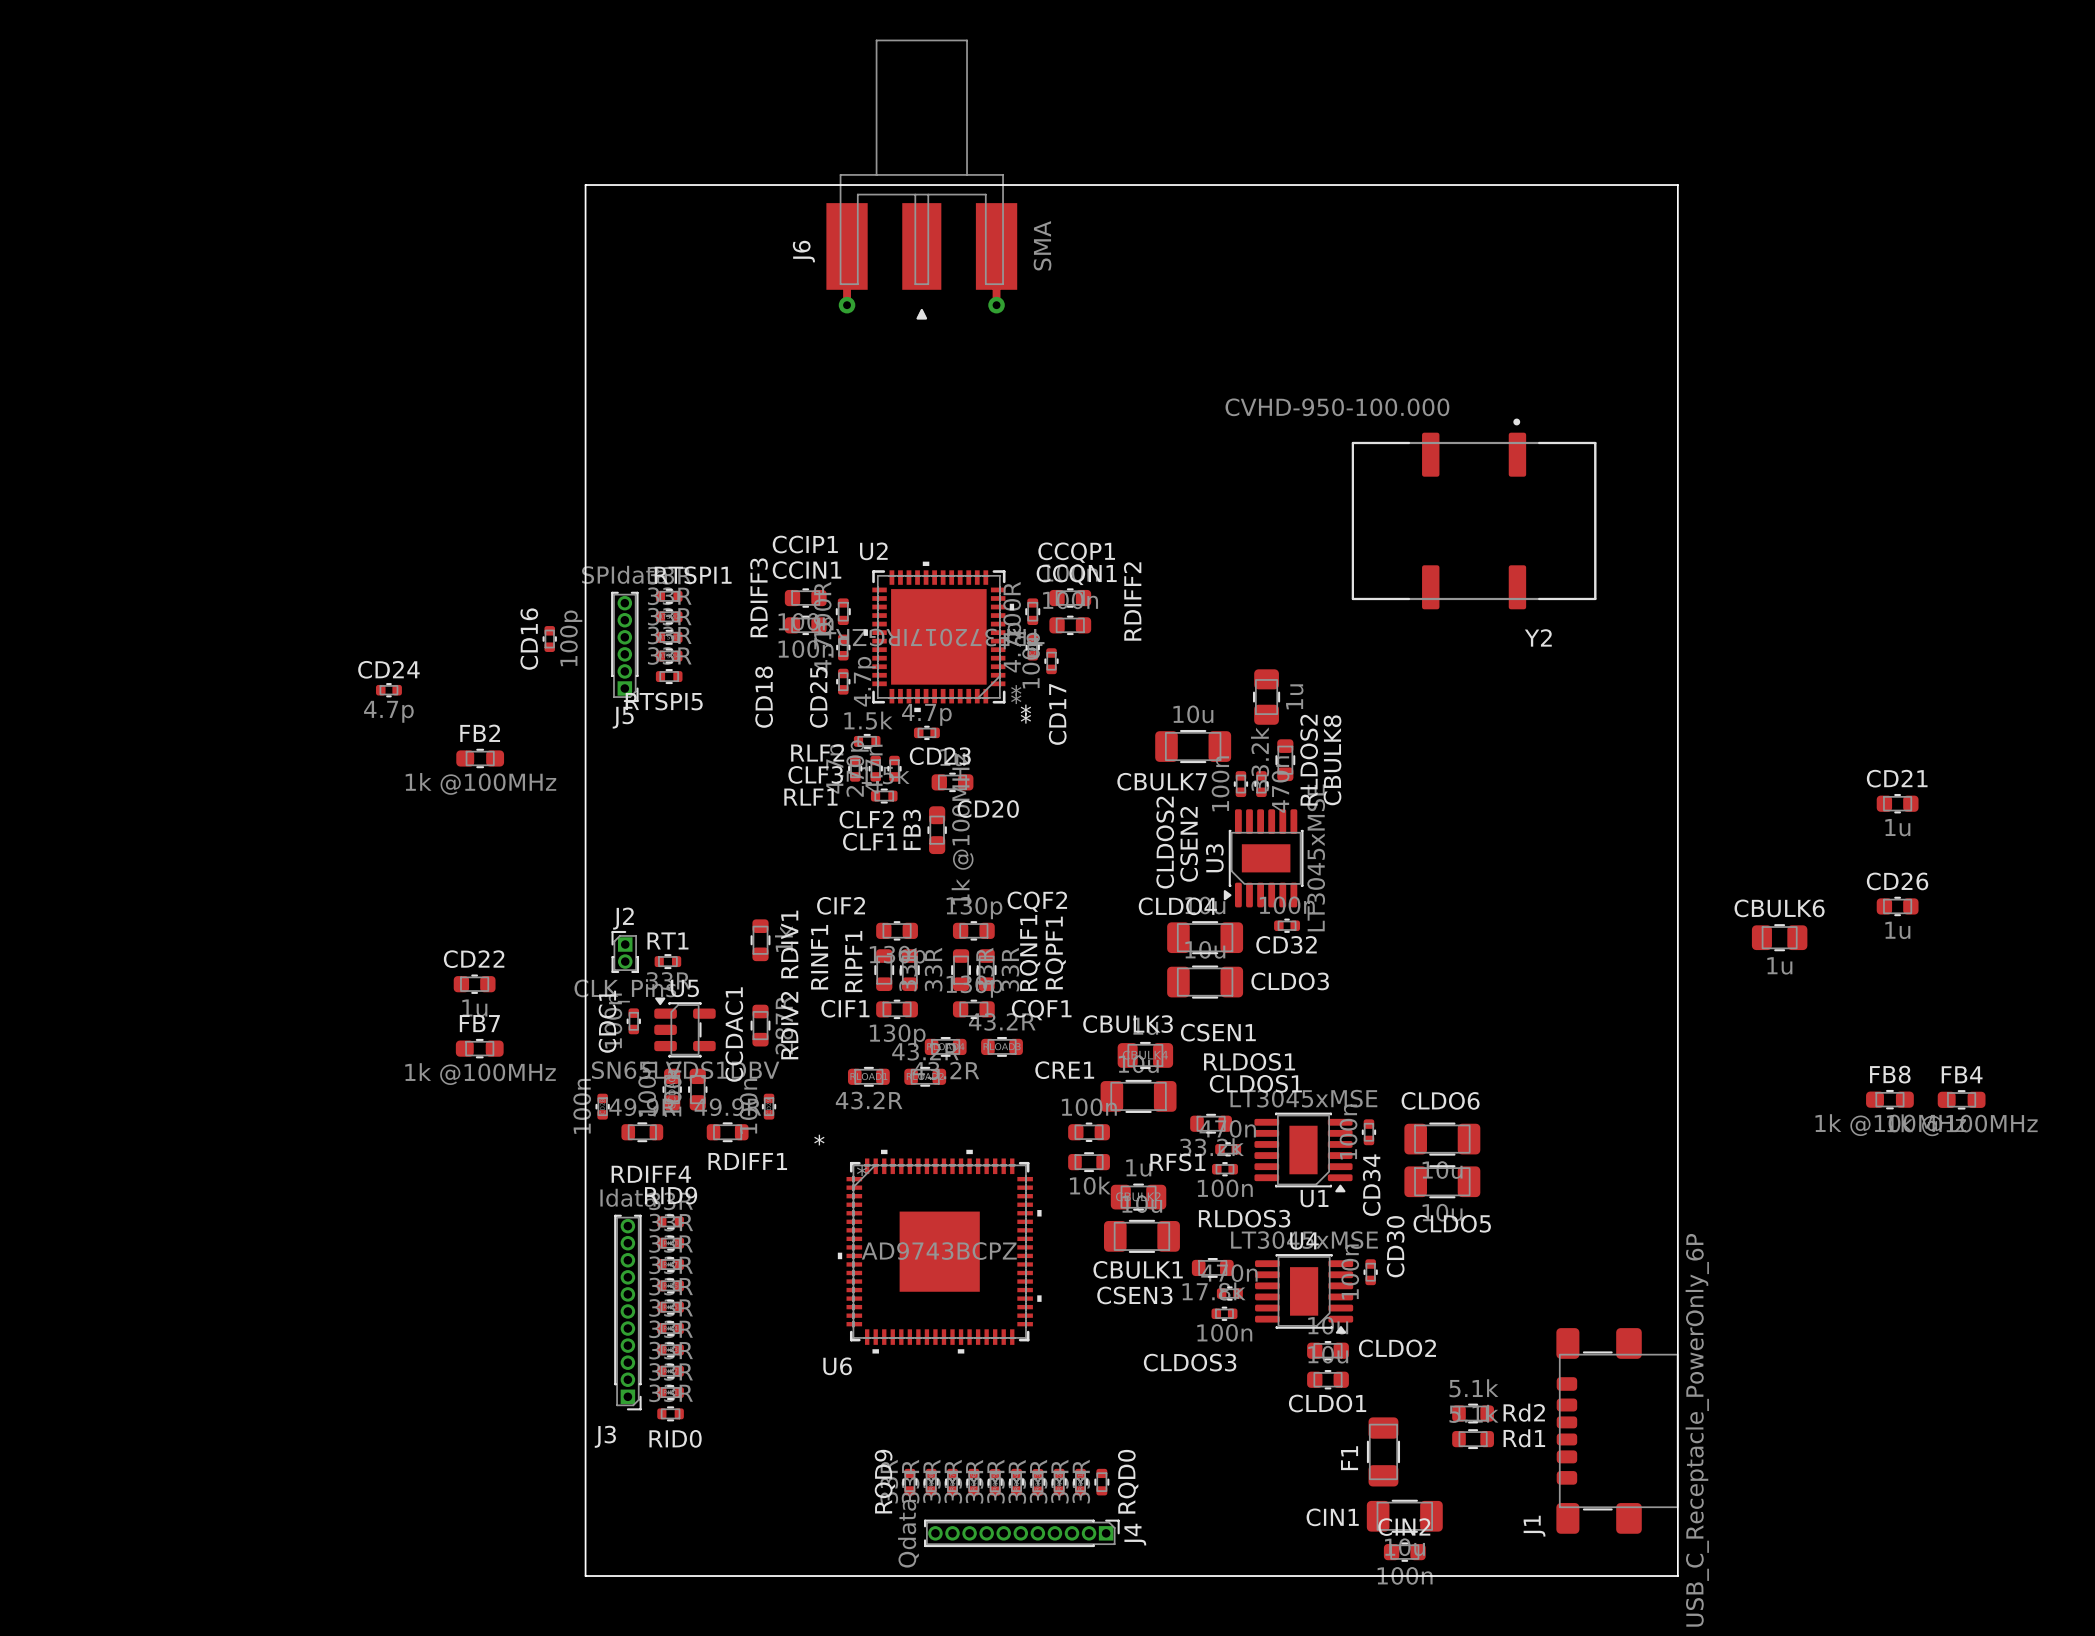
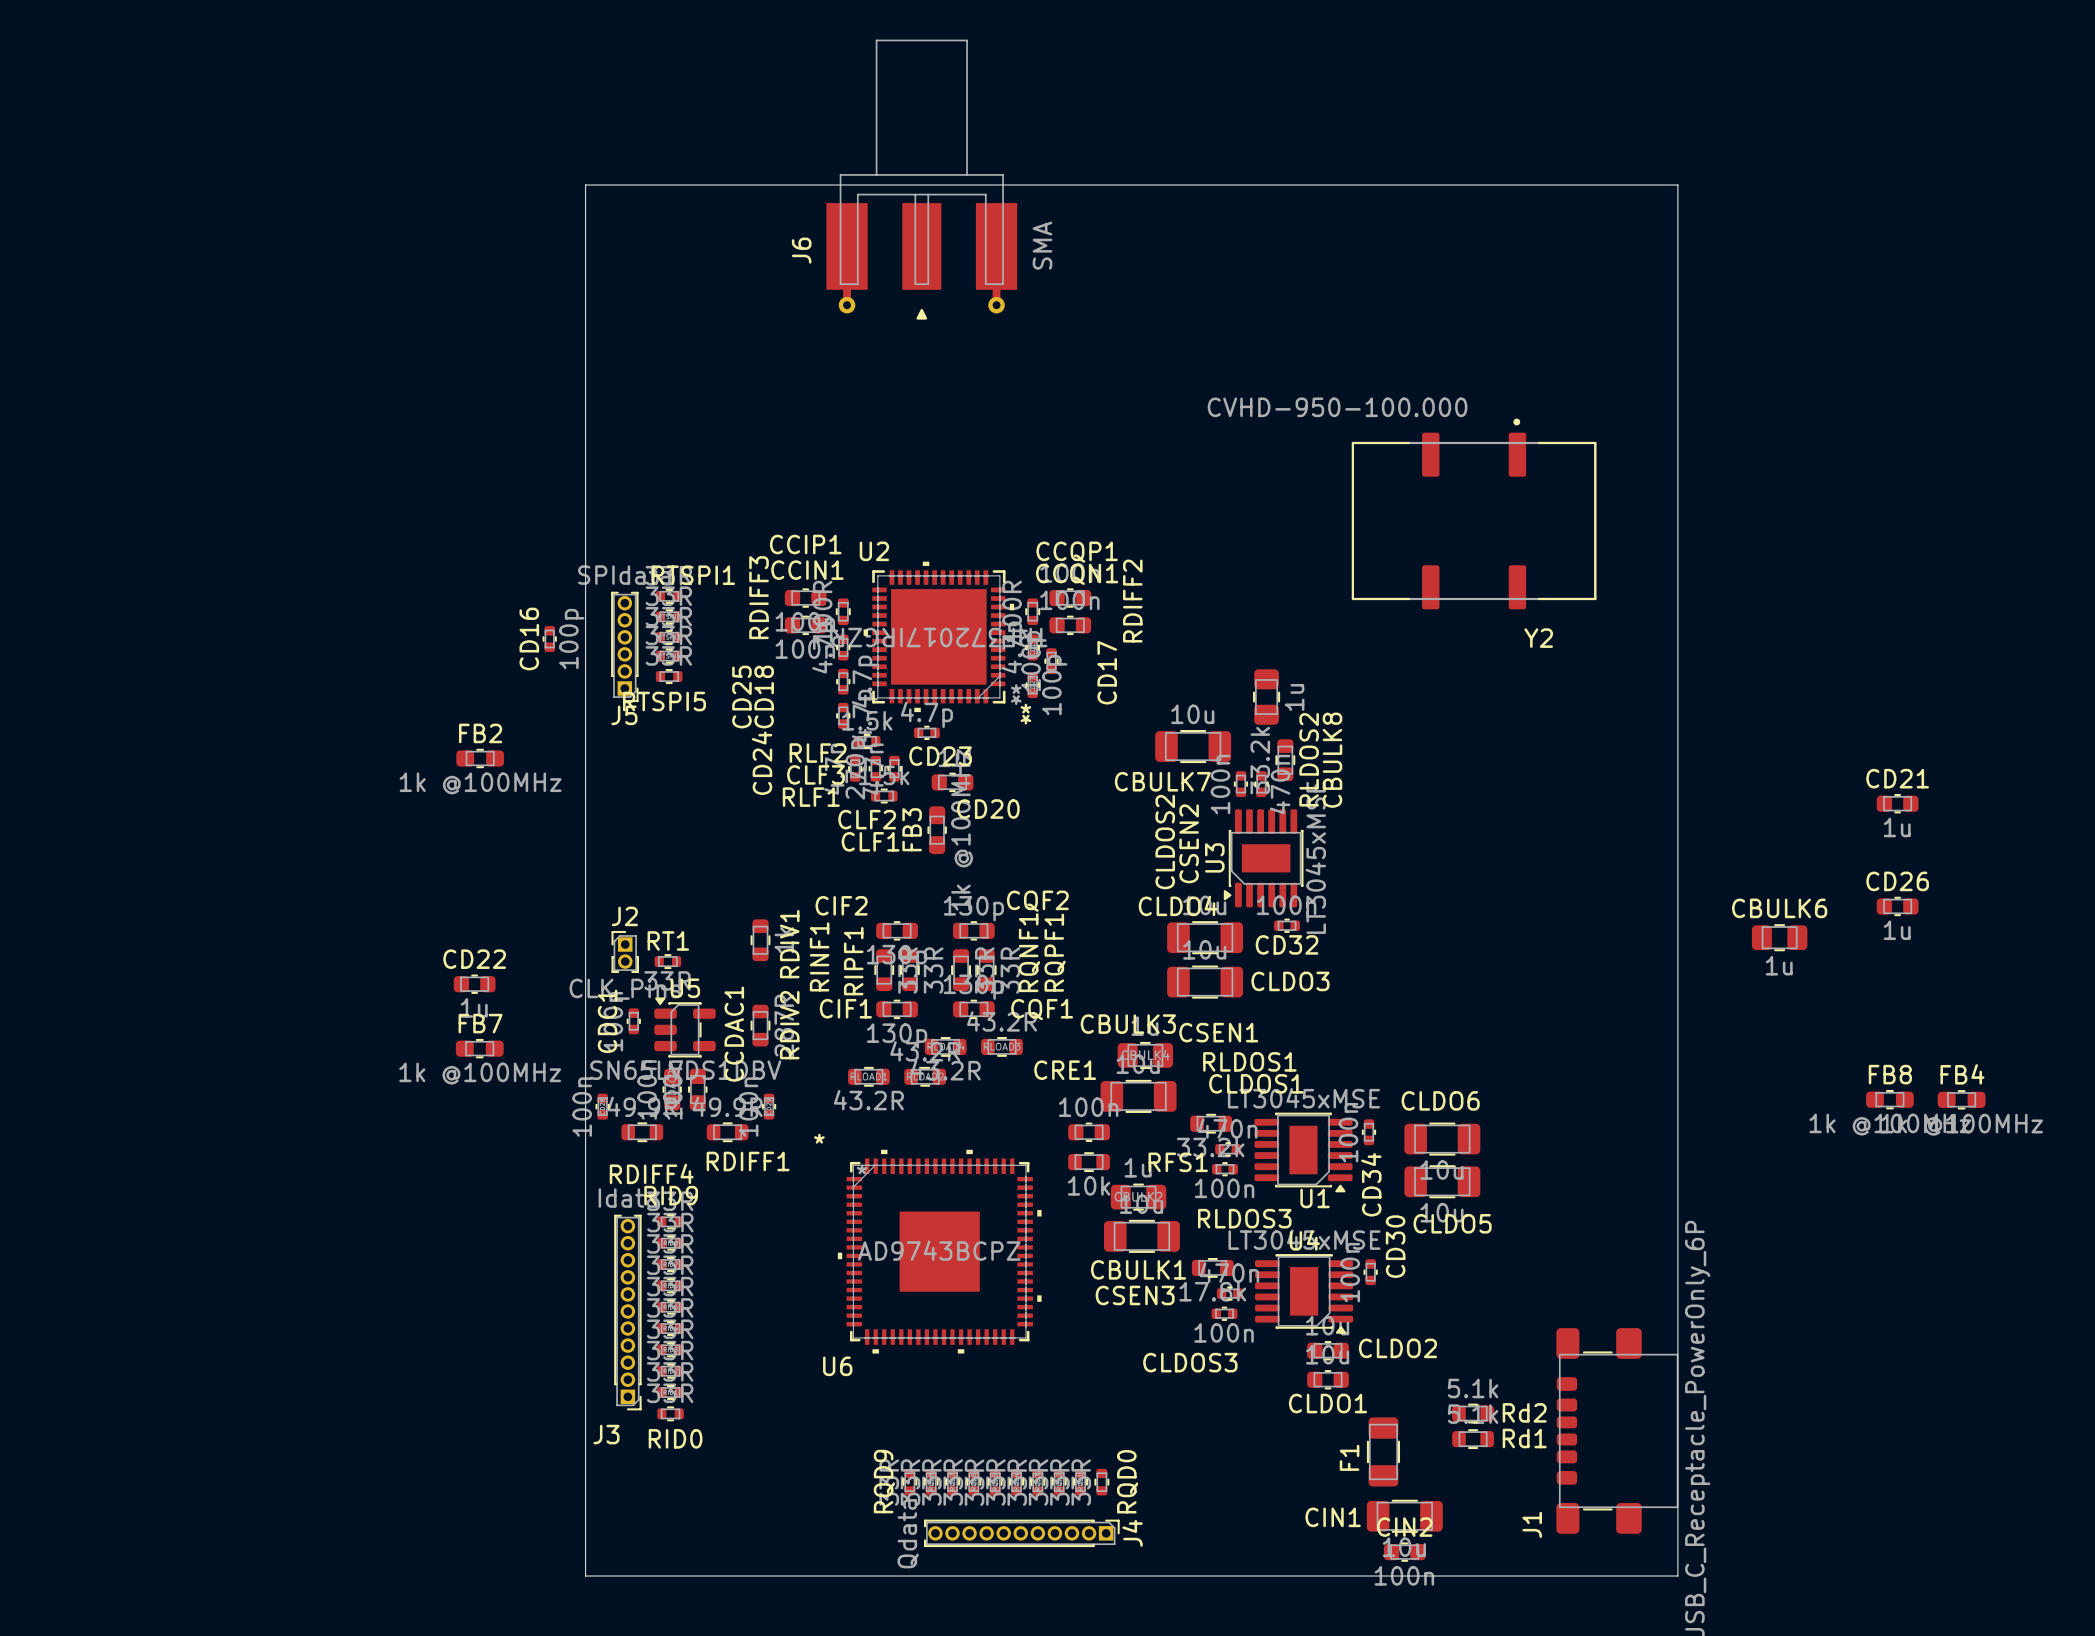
CD24 name position: CD24 (388, 669) -> CD24 (762, 763)
part: none -> 100p (1032, 685)
CD24 rotation: 0° (388, 690) -> 90° clockwise (843, 715)
CD24 position: (388, 690) -> (843, 715)
CD25 name position: CD25 (818, 697) -> CD25 (741, 697)
CD17 name position: CD17 (1057, 714) -> CD17 (1107, 672)

